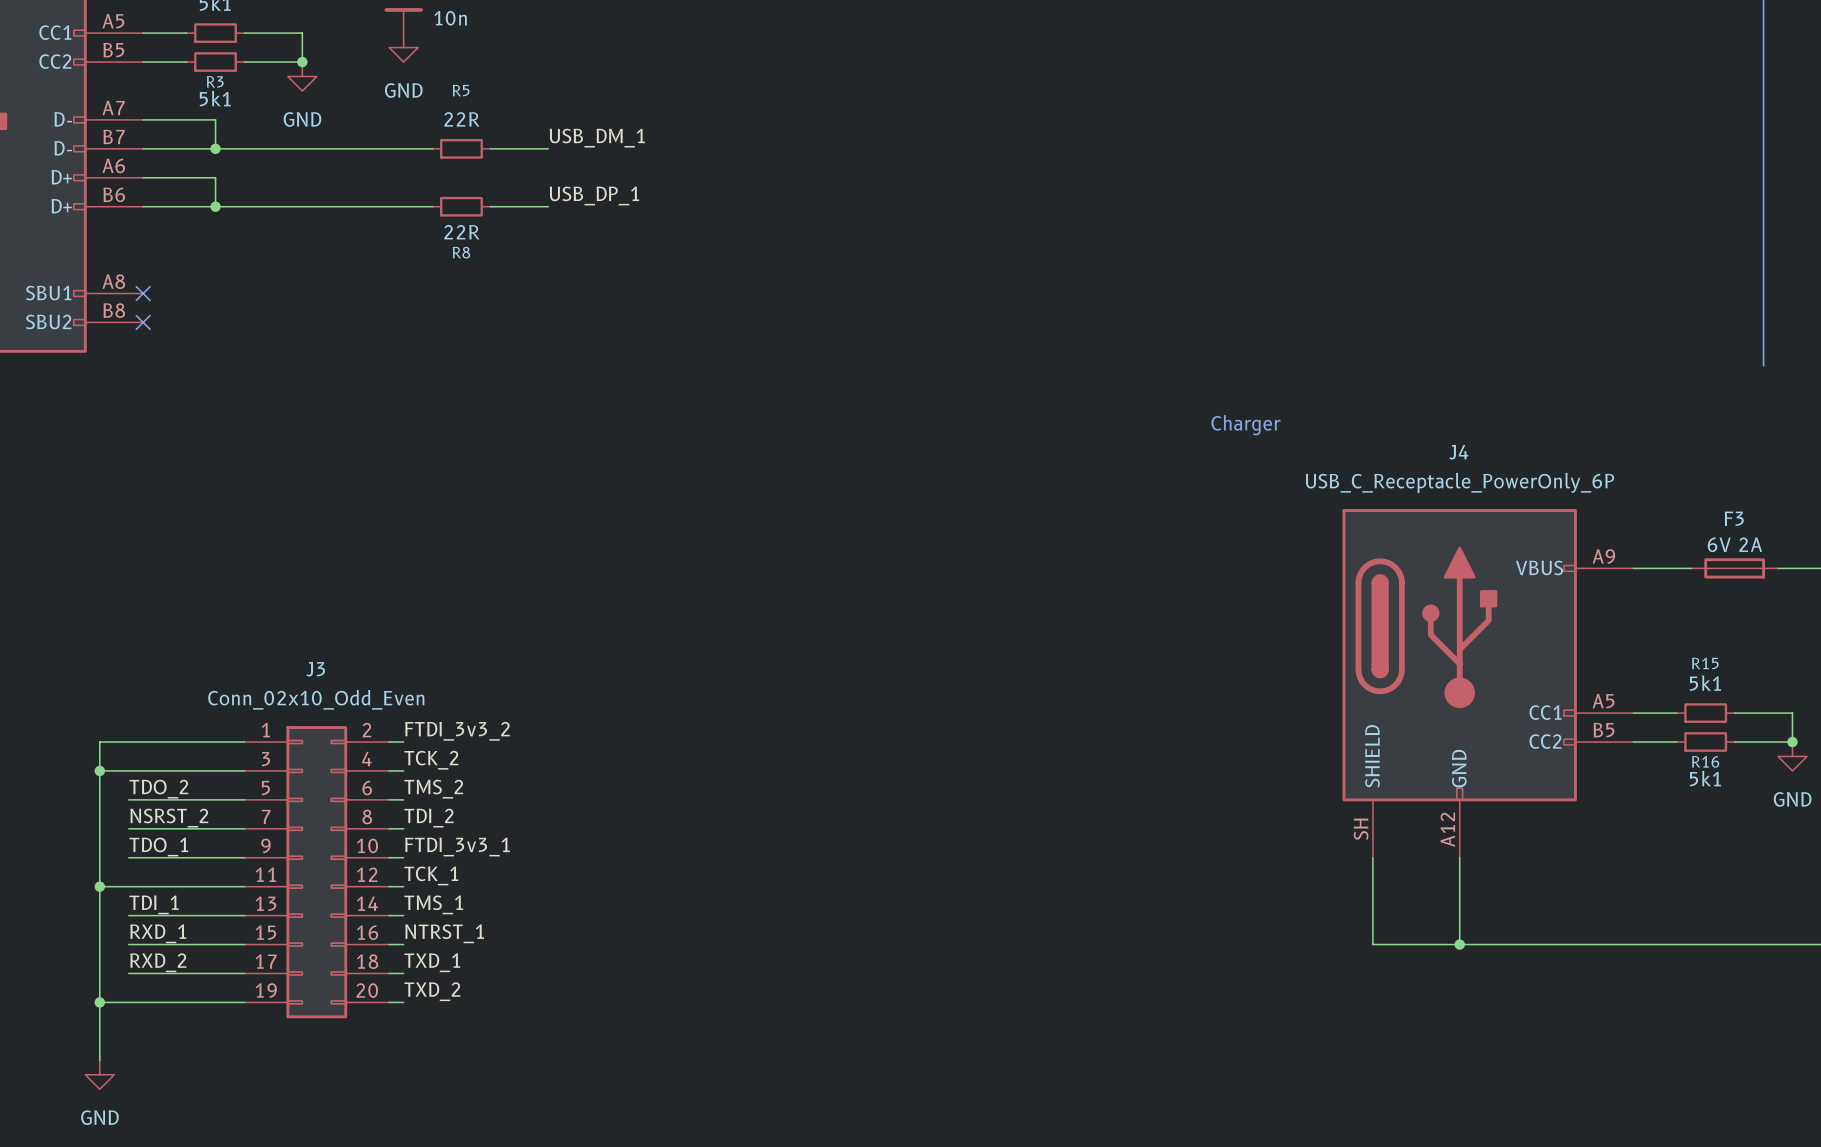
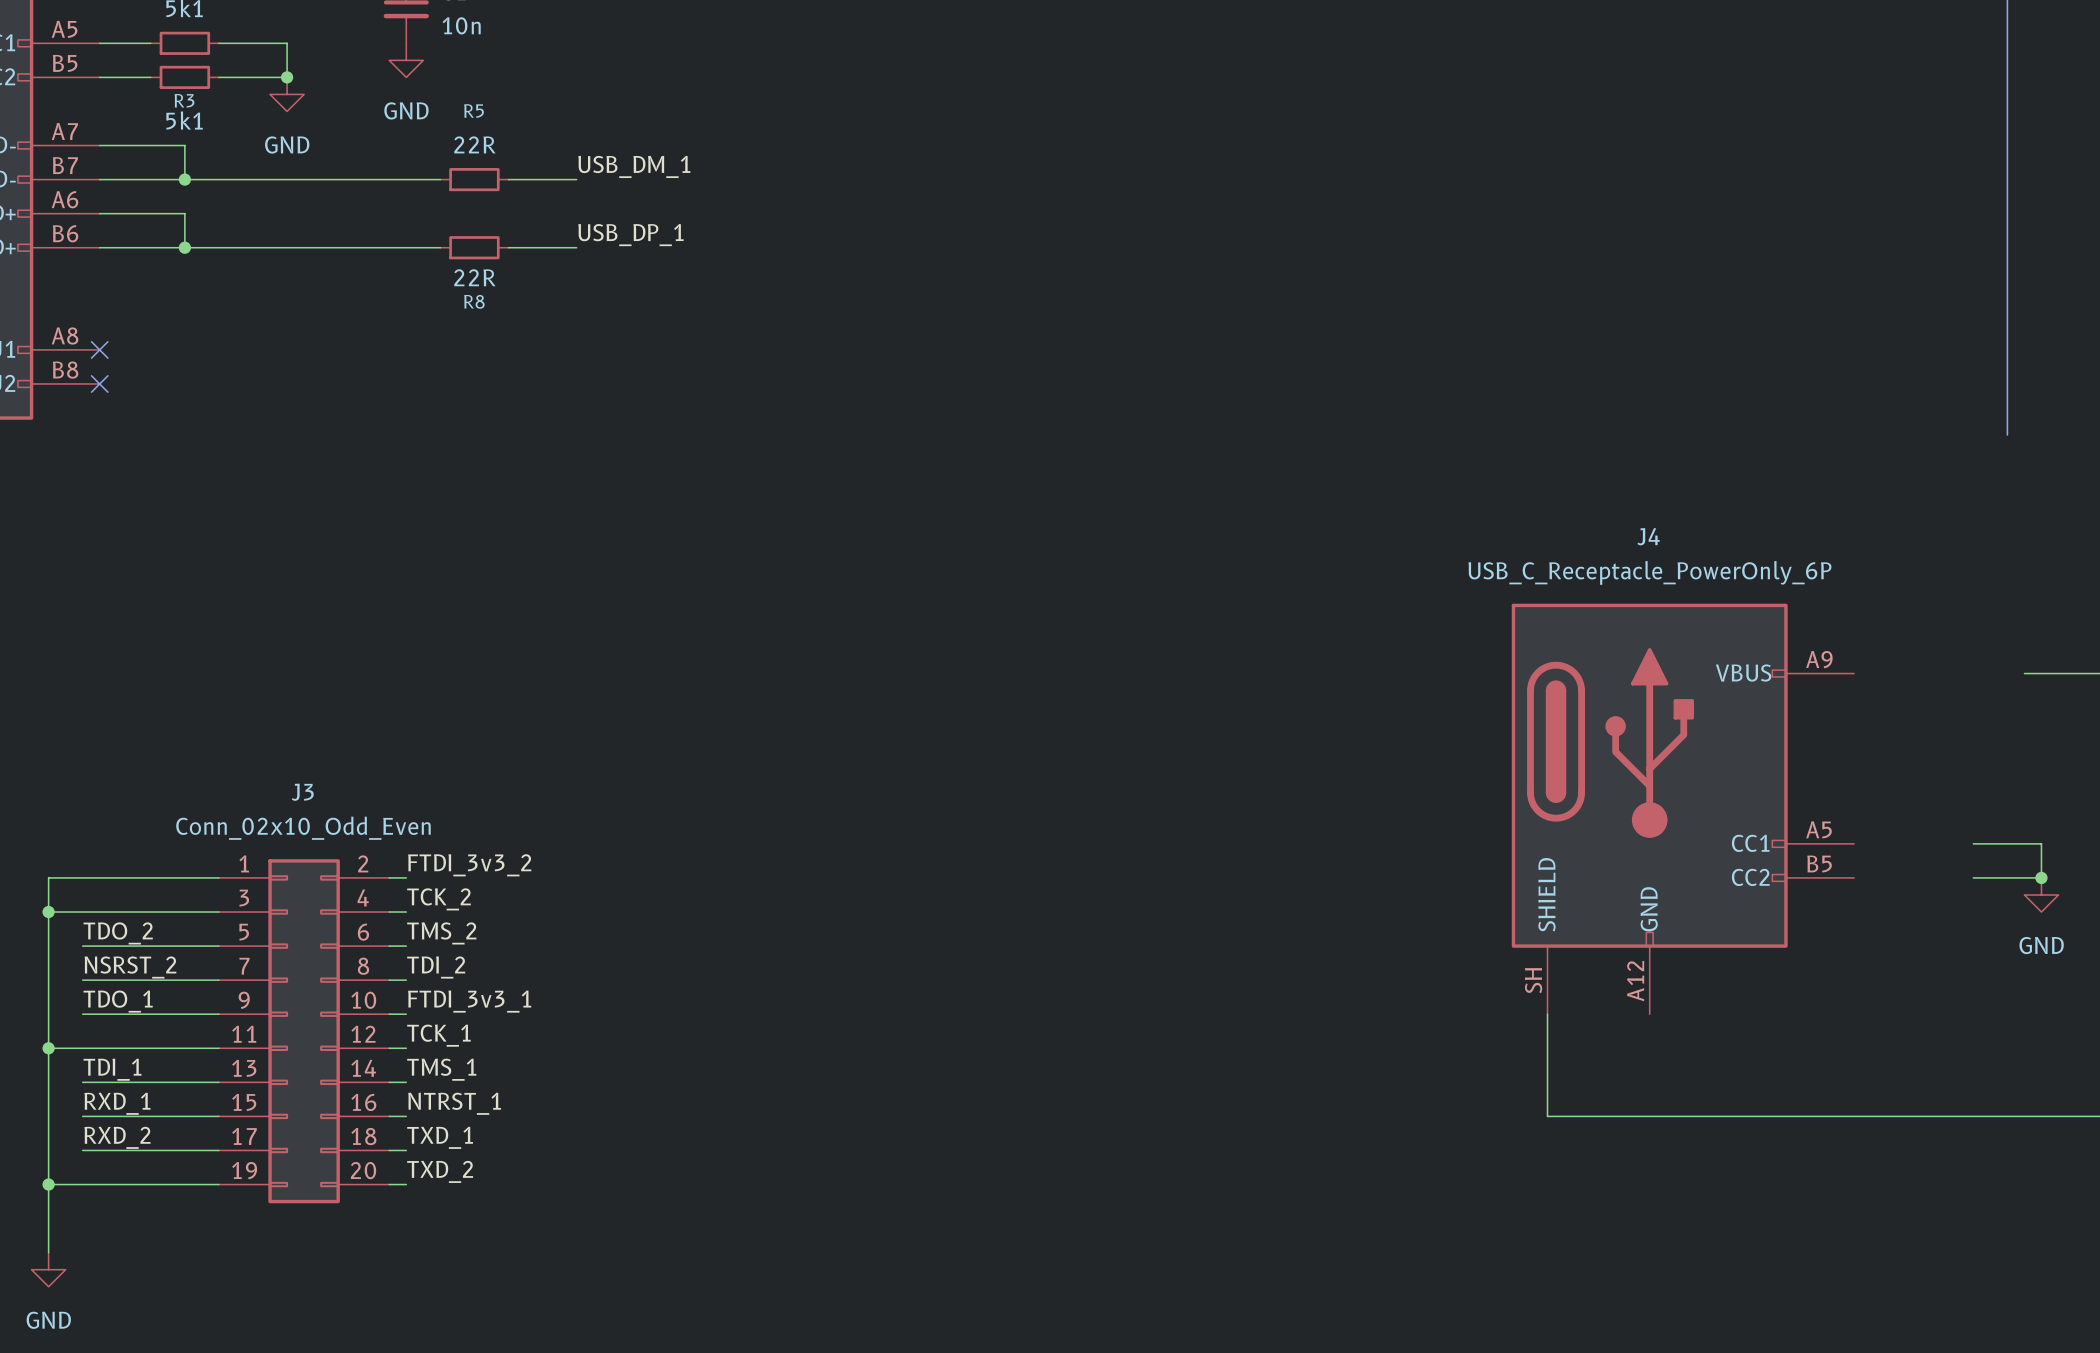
text: Charger (1246, 425) -> none
wire: (1633, 568) (1691, 568) -> none
F3: 6V 2A (1734, 568) -> none
wire: (1633, 713) (1676, 713) -> none
R15: 5k1 (1705, 713) -> none
wire: (1633, 742) (1676, 742) -> none
R16: 5k1 (1705, 742) -> none
wire: (1459, 857) (1459, 944) -> none
junction: (1459, 944) -> none

